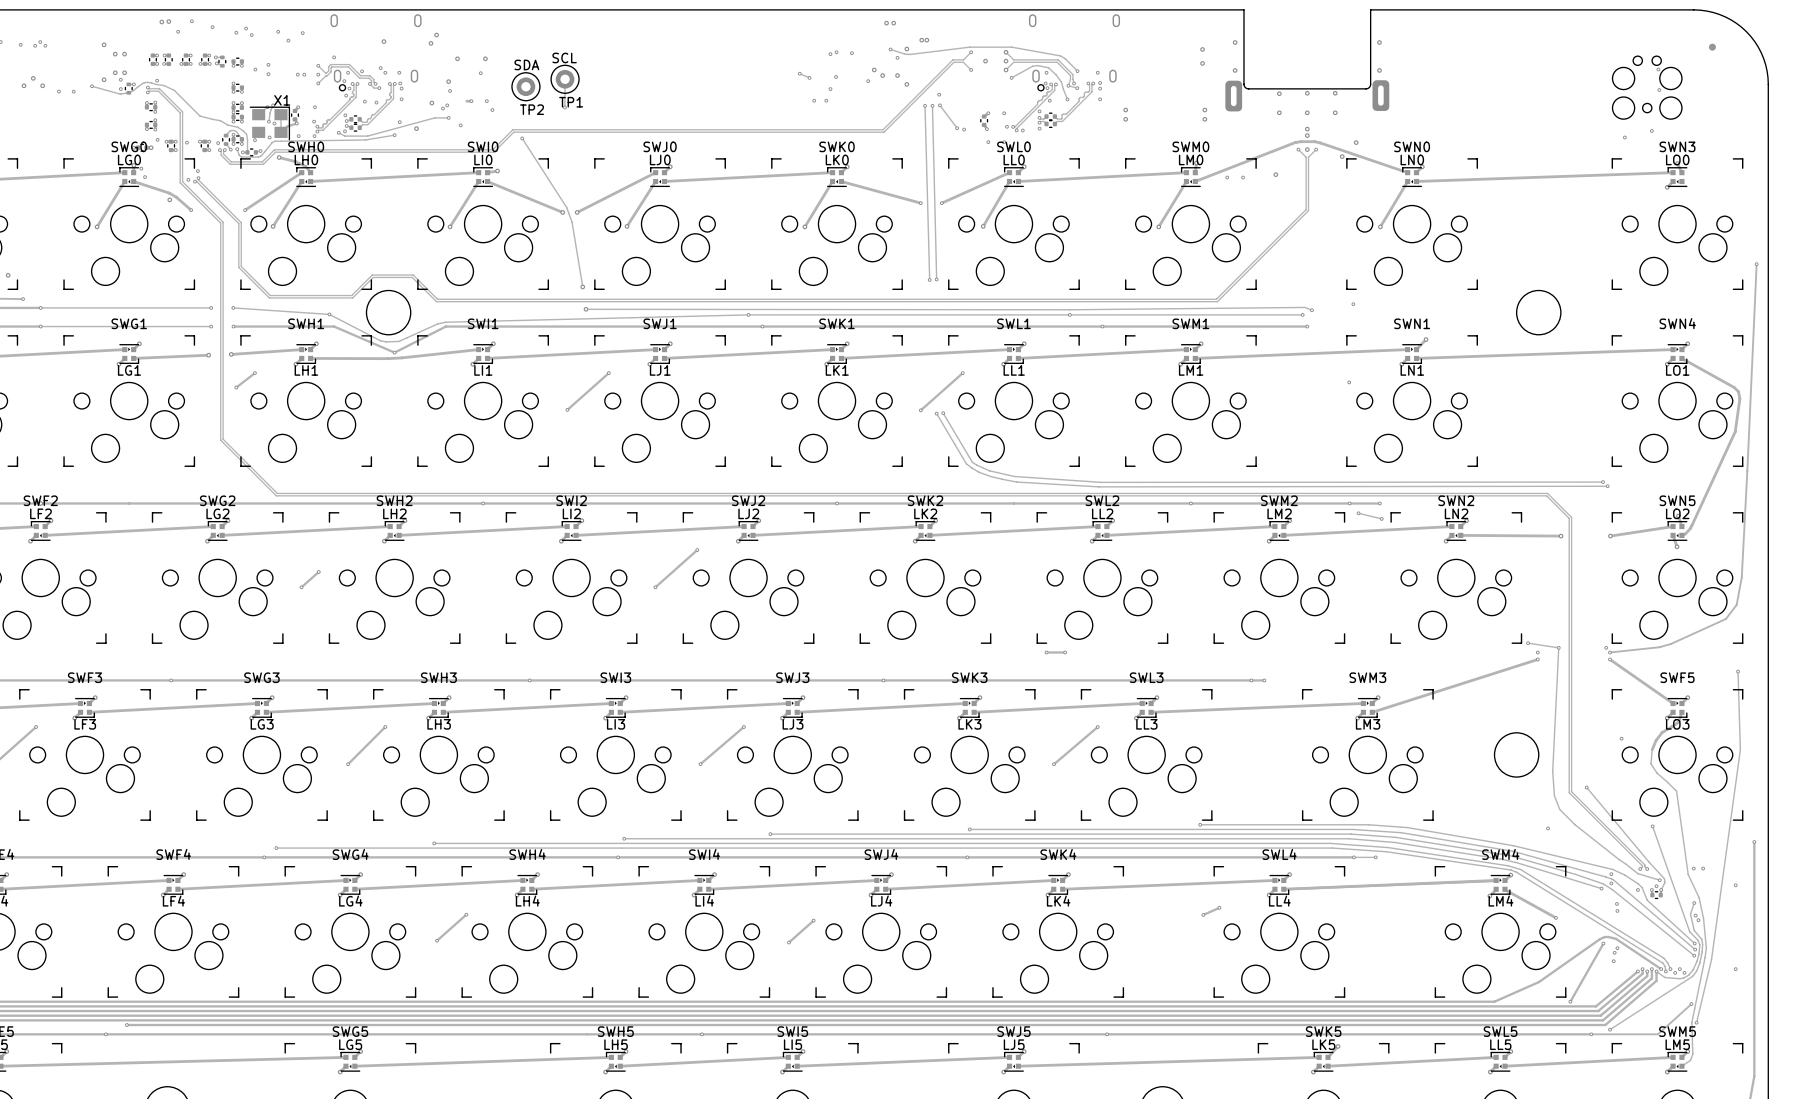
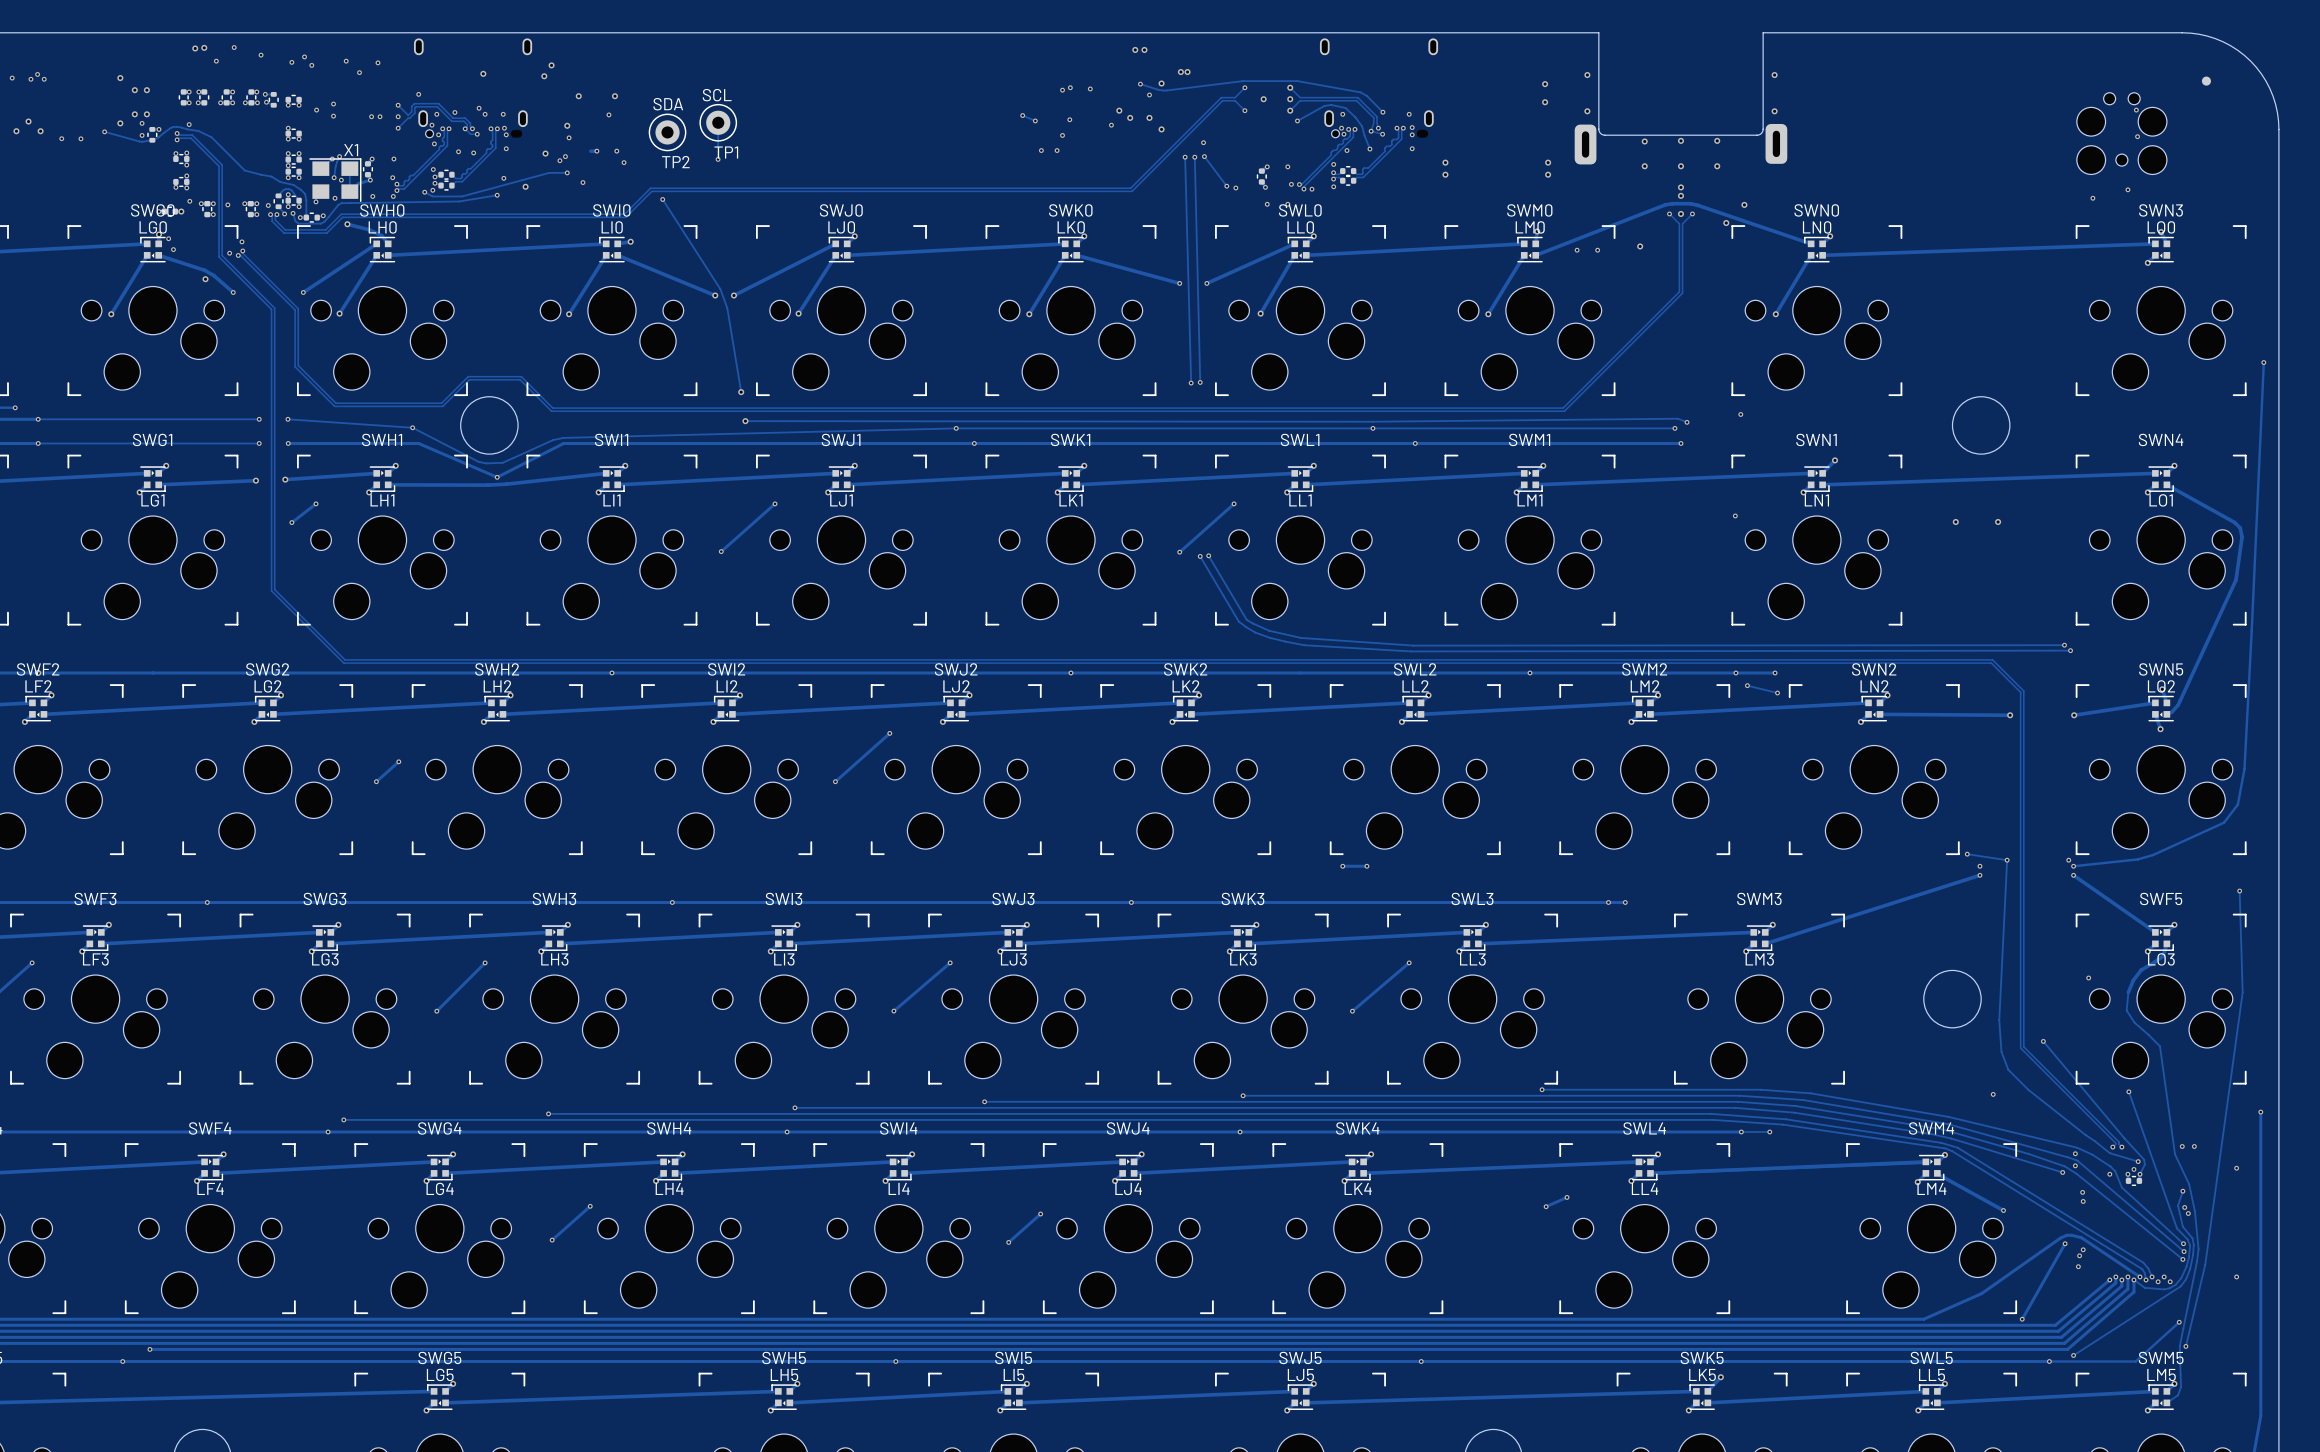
via: none -> (1955, 521)
via: none -> (1998, 521)

